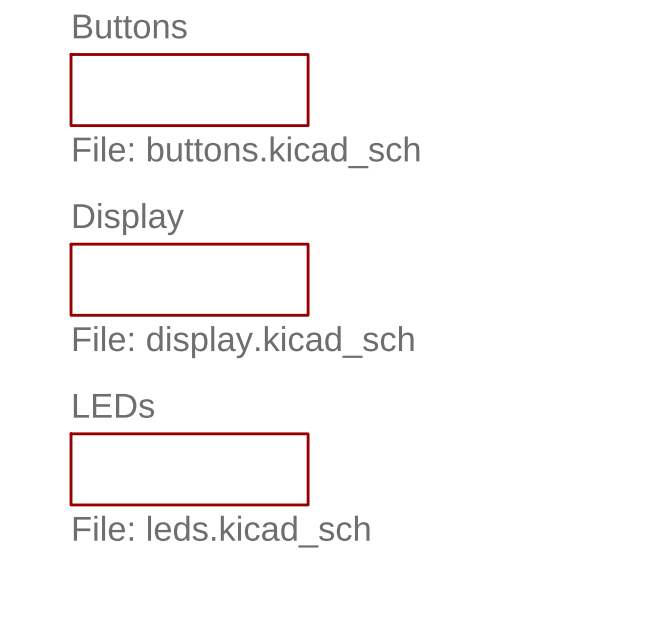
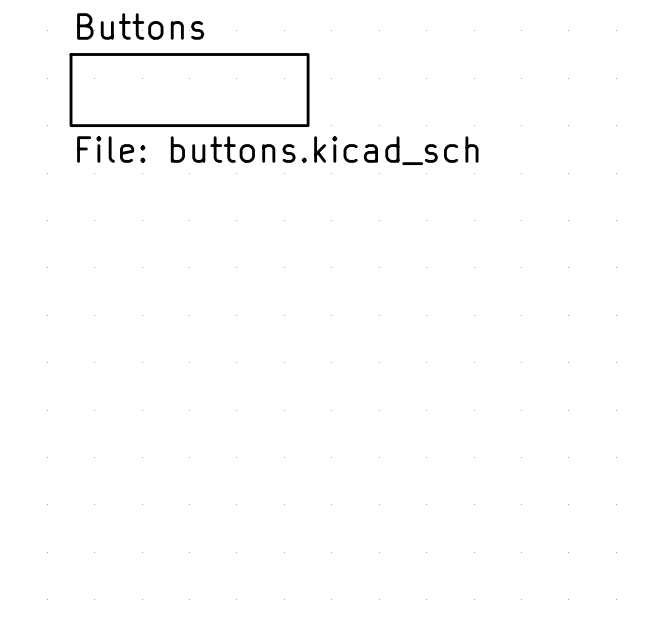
sheet Display: File: display.kicad_sch (189, 279) -> none
sheet LEDs: File: leds.kicad_sch (189, 469) -> none

